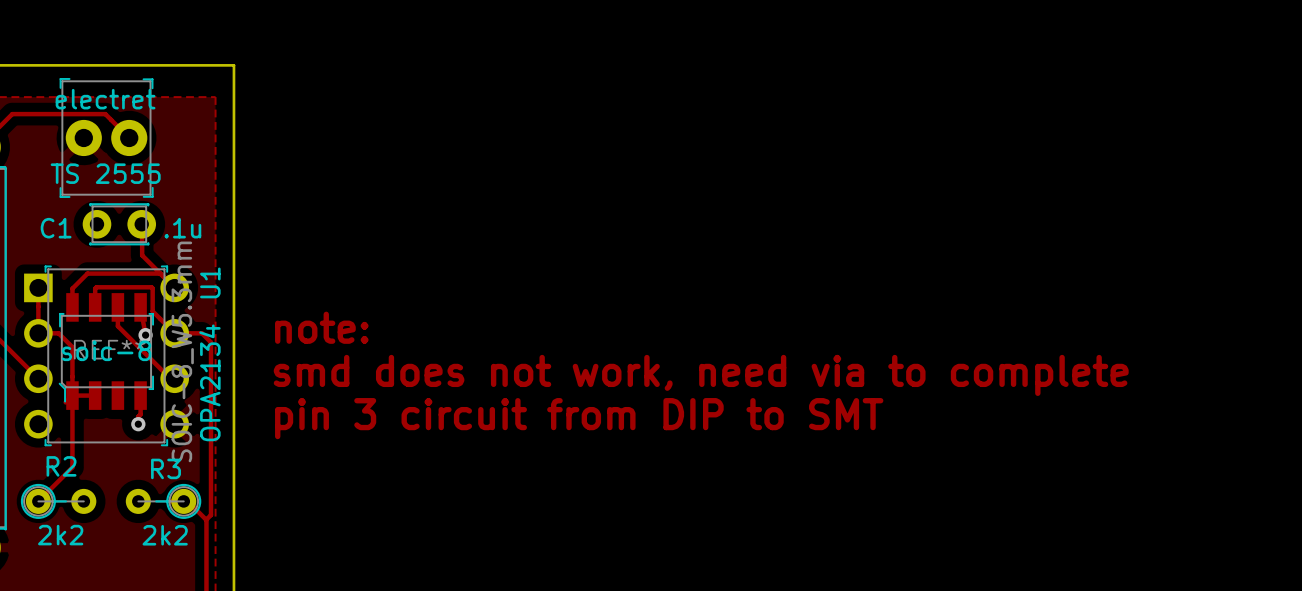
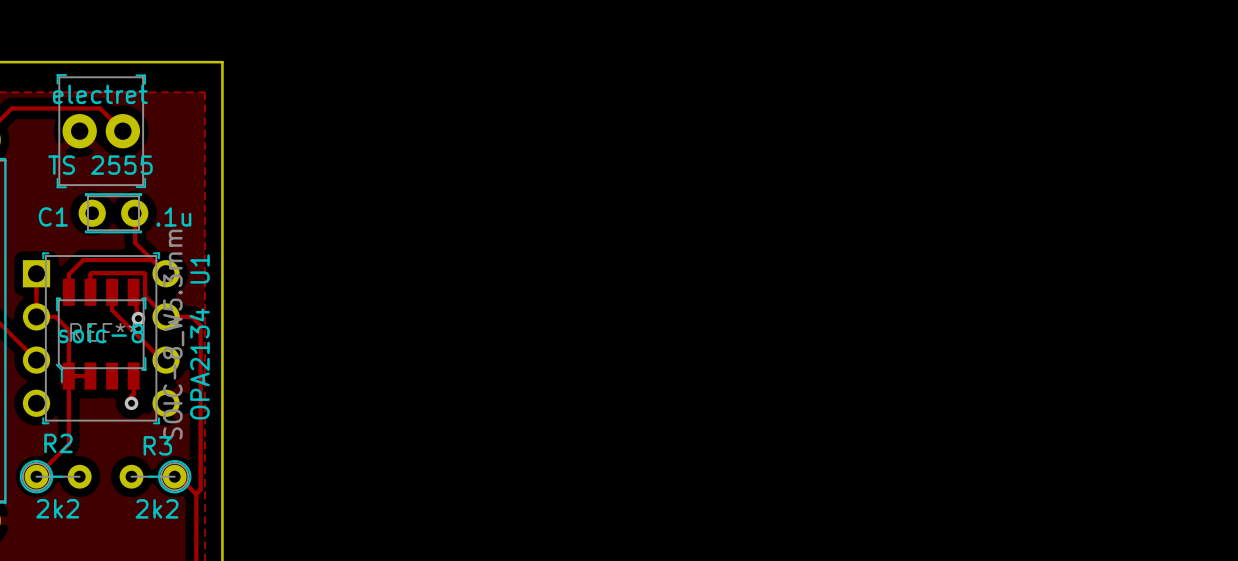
text: note: (321, 327) -> none
text: smd does not work, need via to complete (701, 375) -> none
text: pin 3 circuit from DIP to SMT (579, 418) -> none

